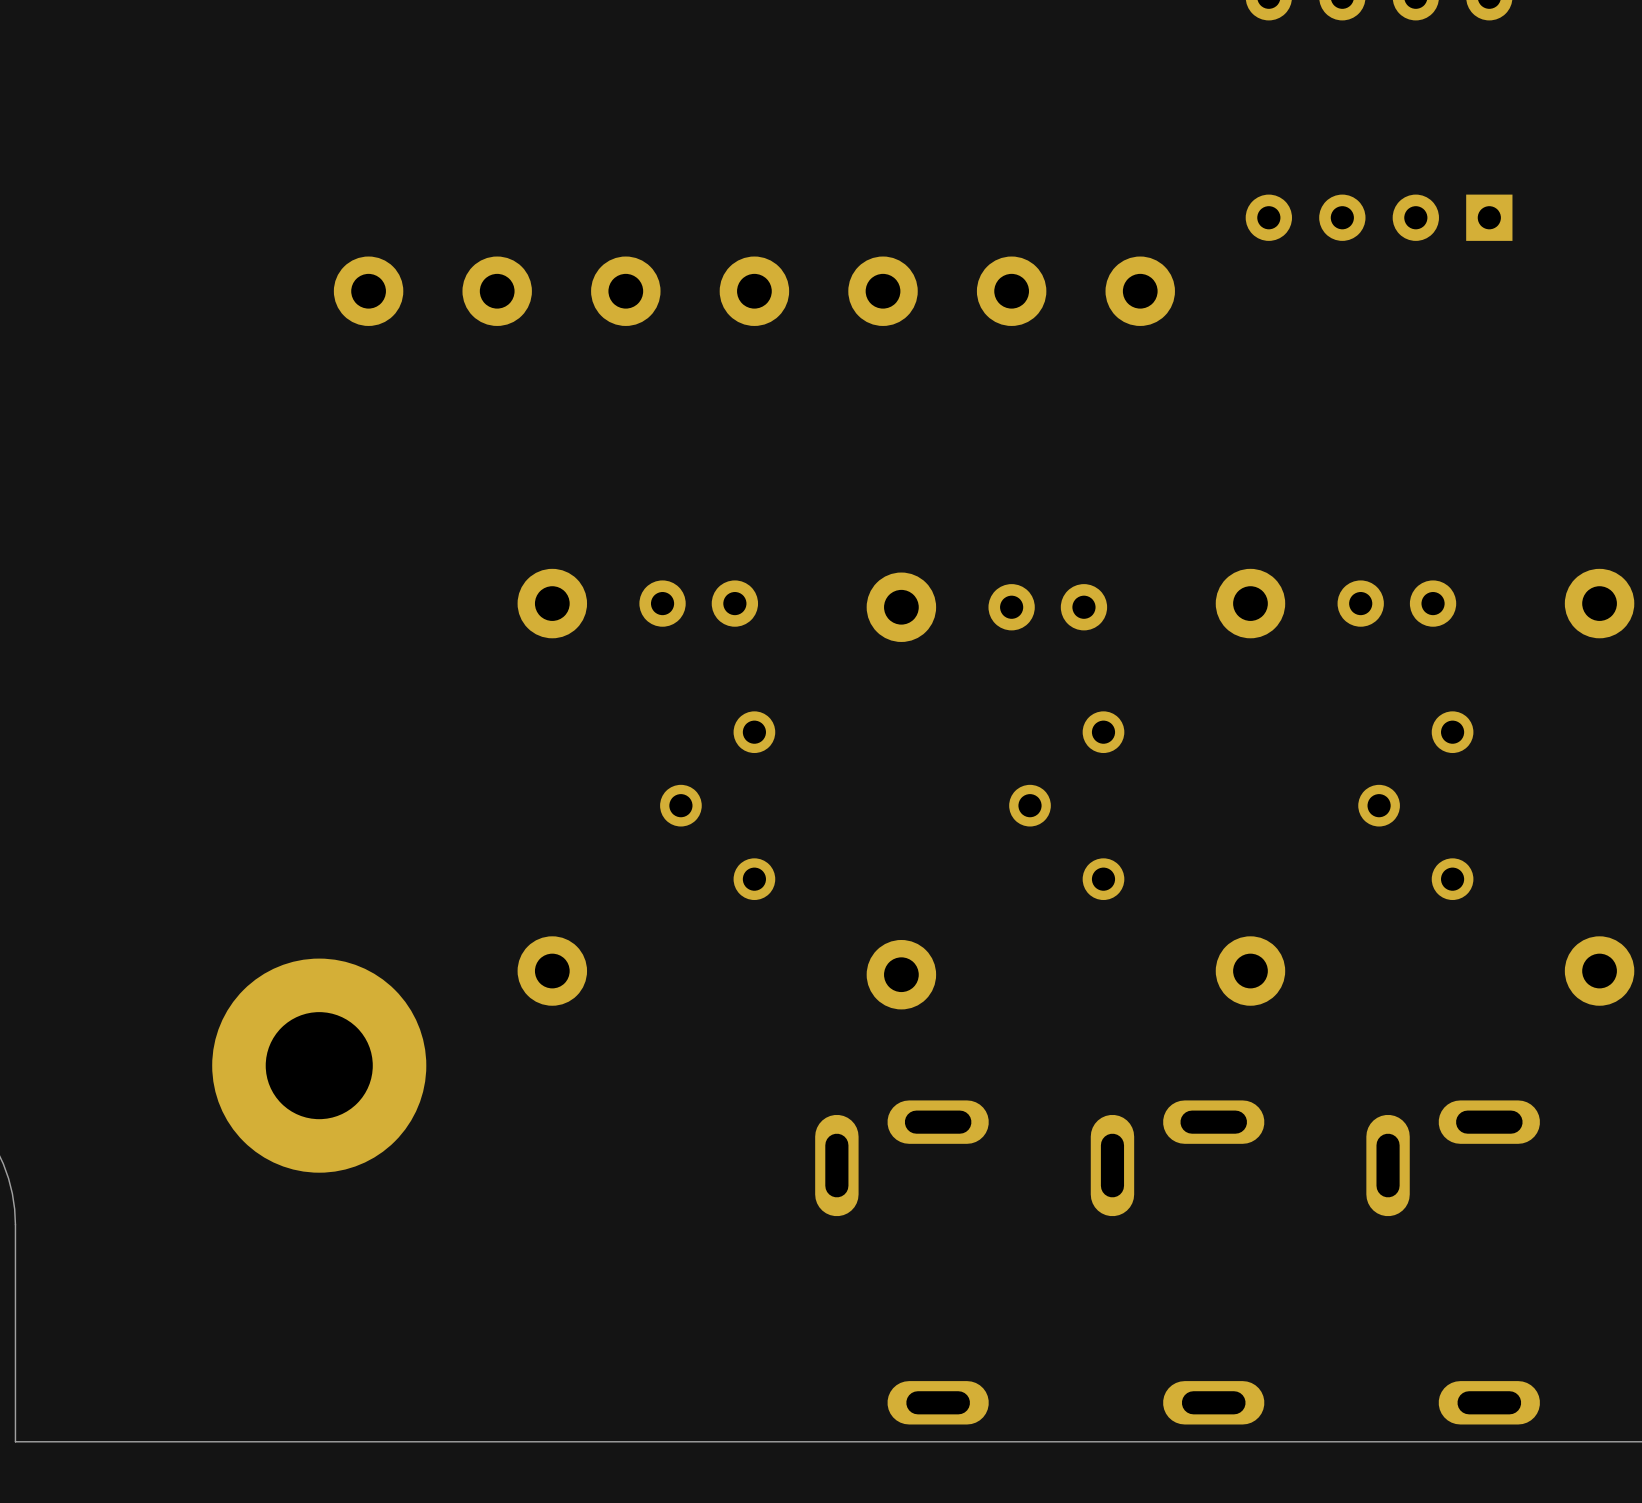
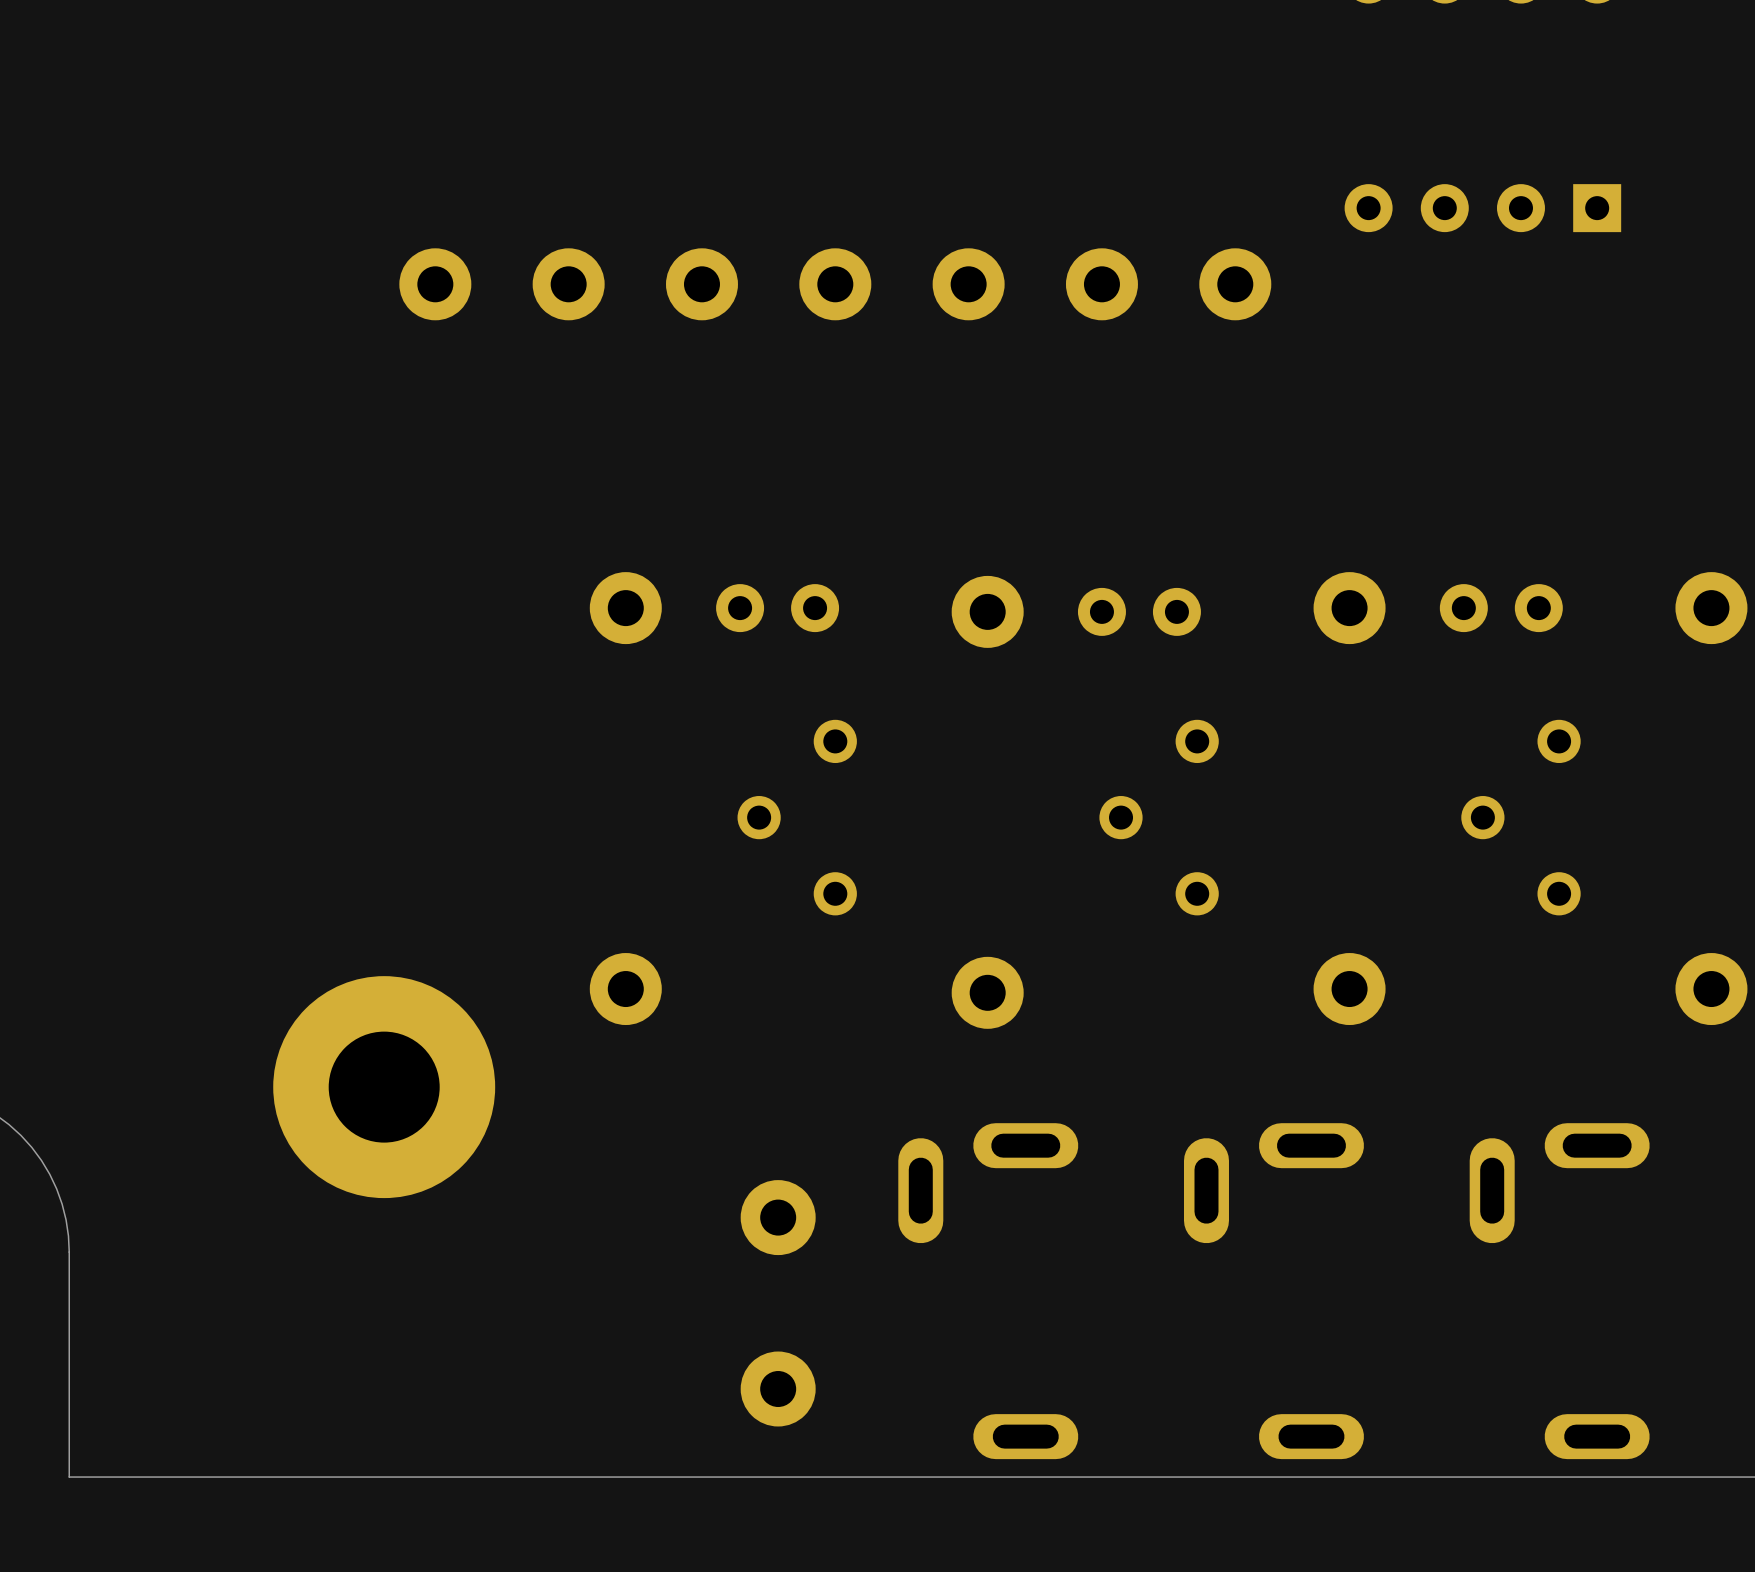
part: none -> (778, 1217)
part: none -> (778, 1389)

